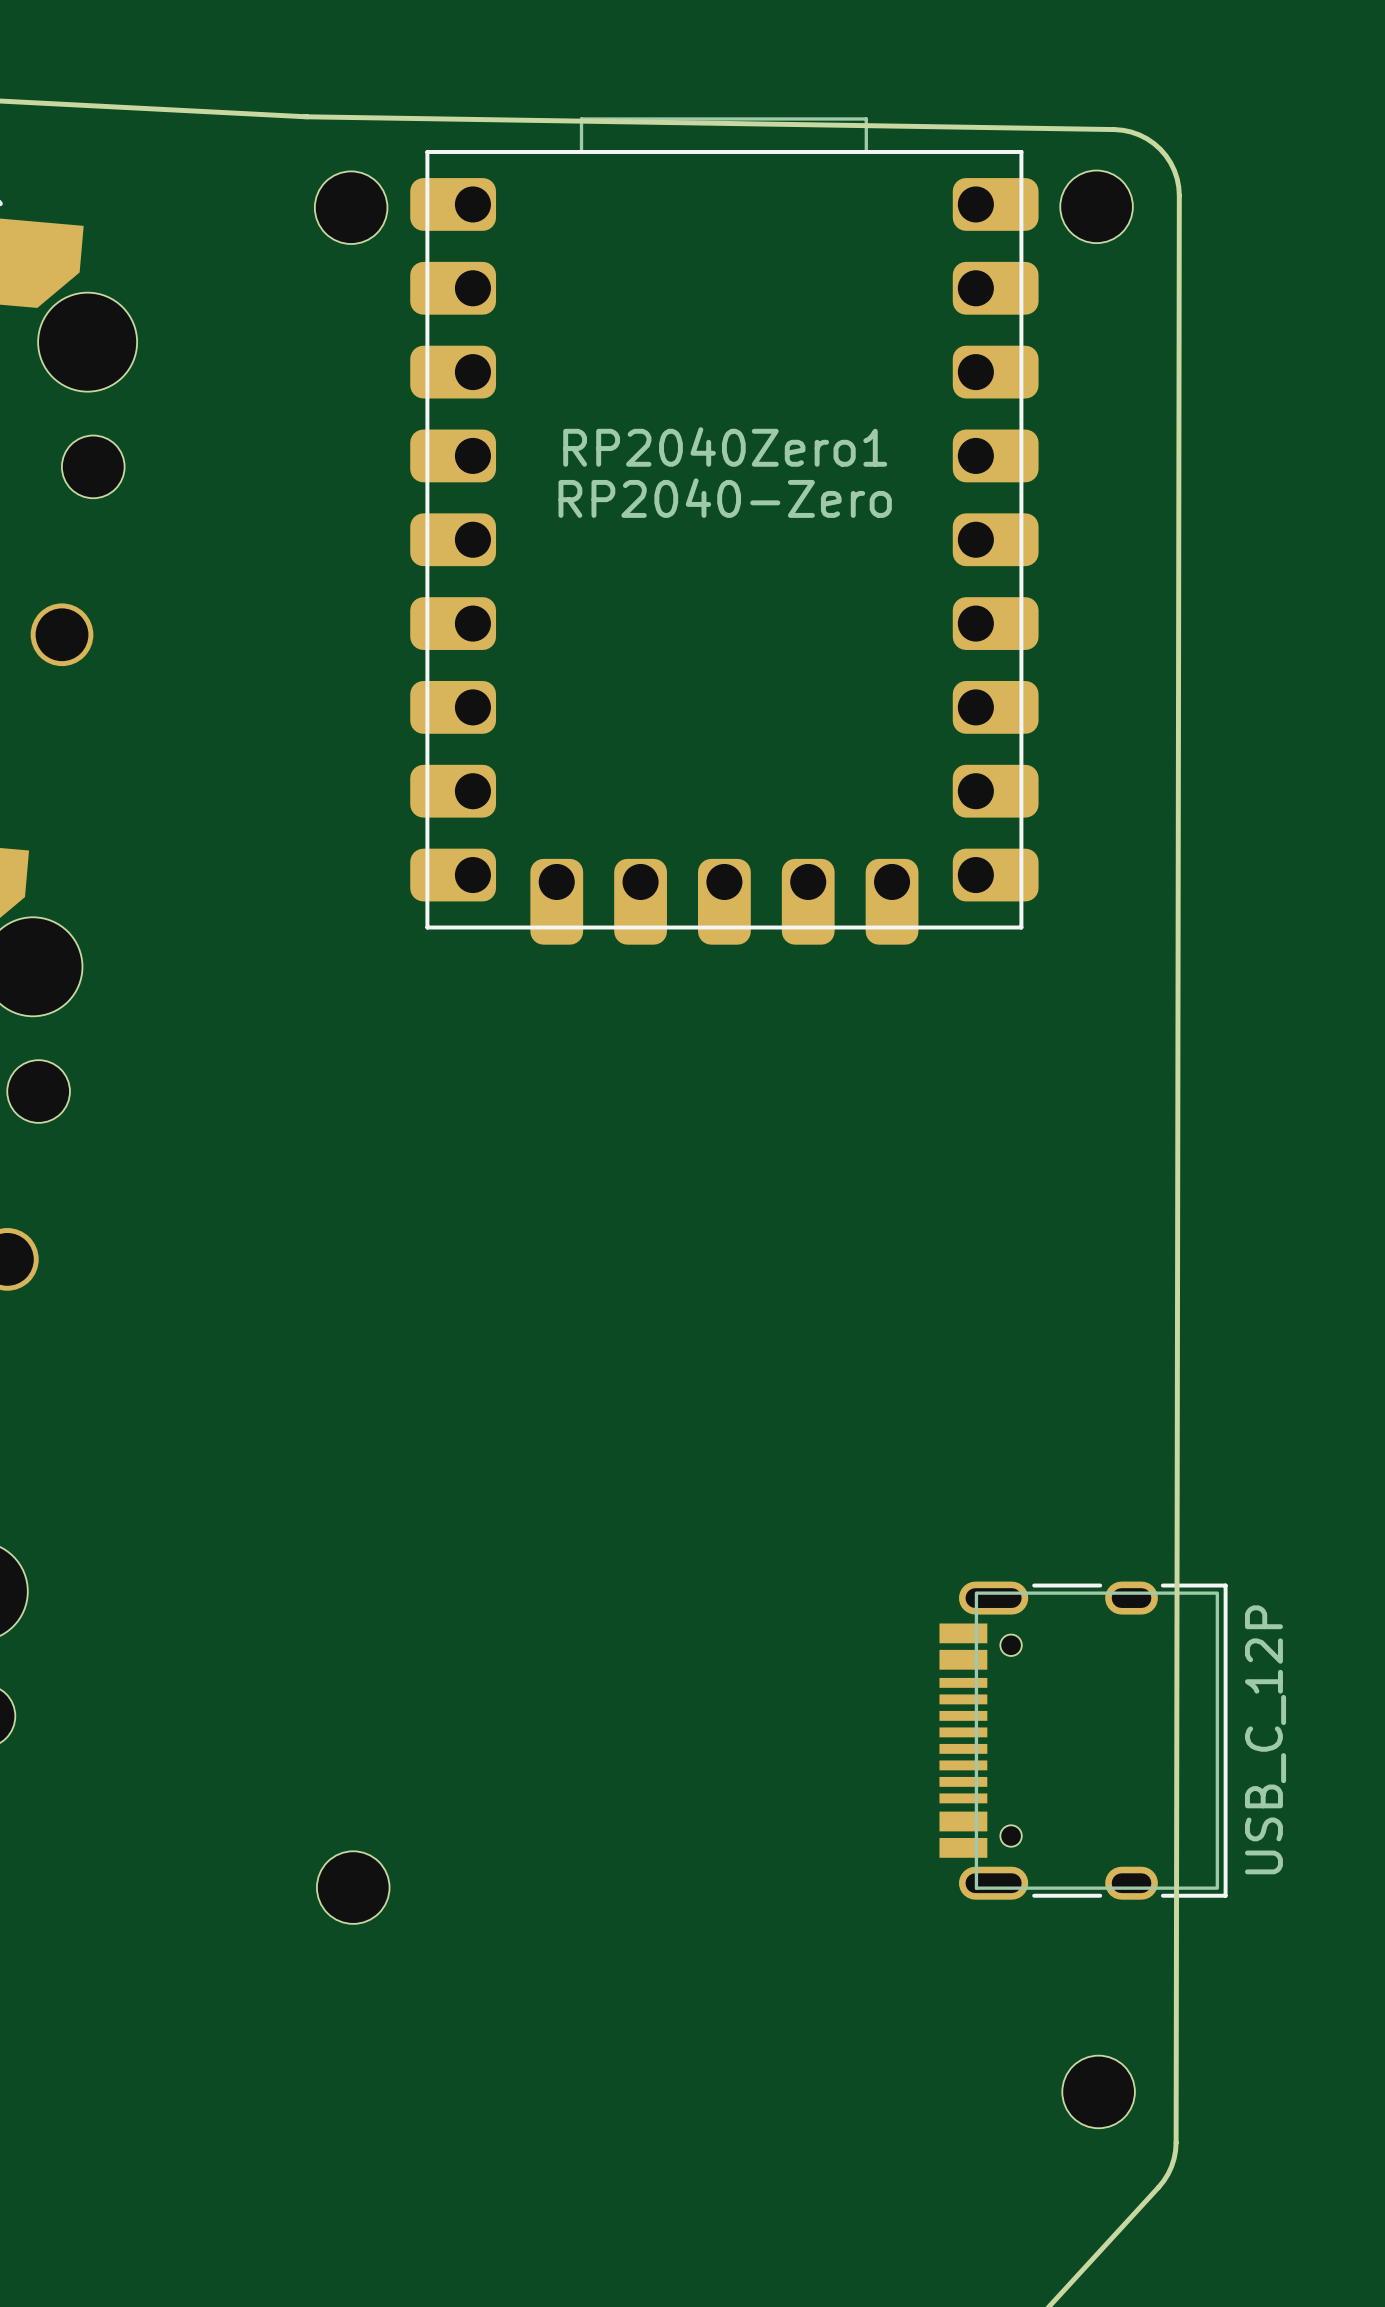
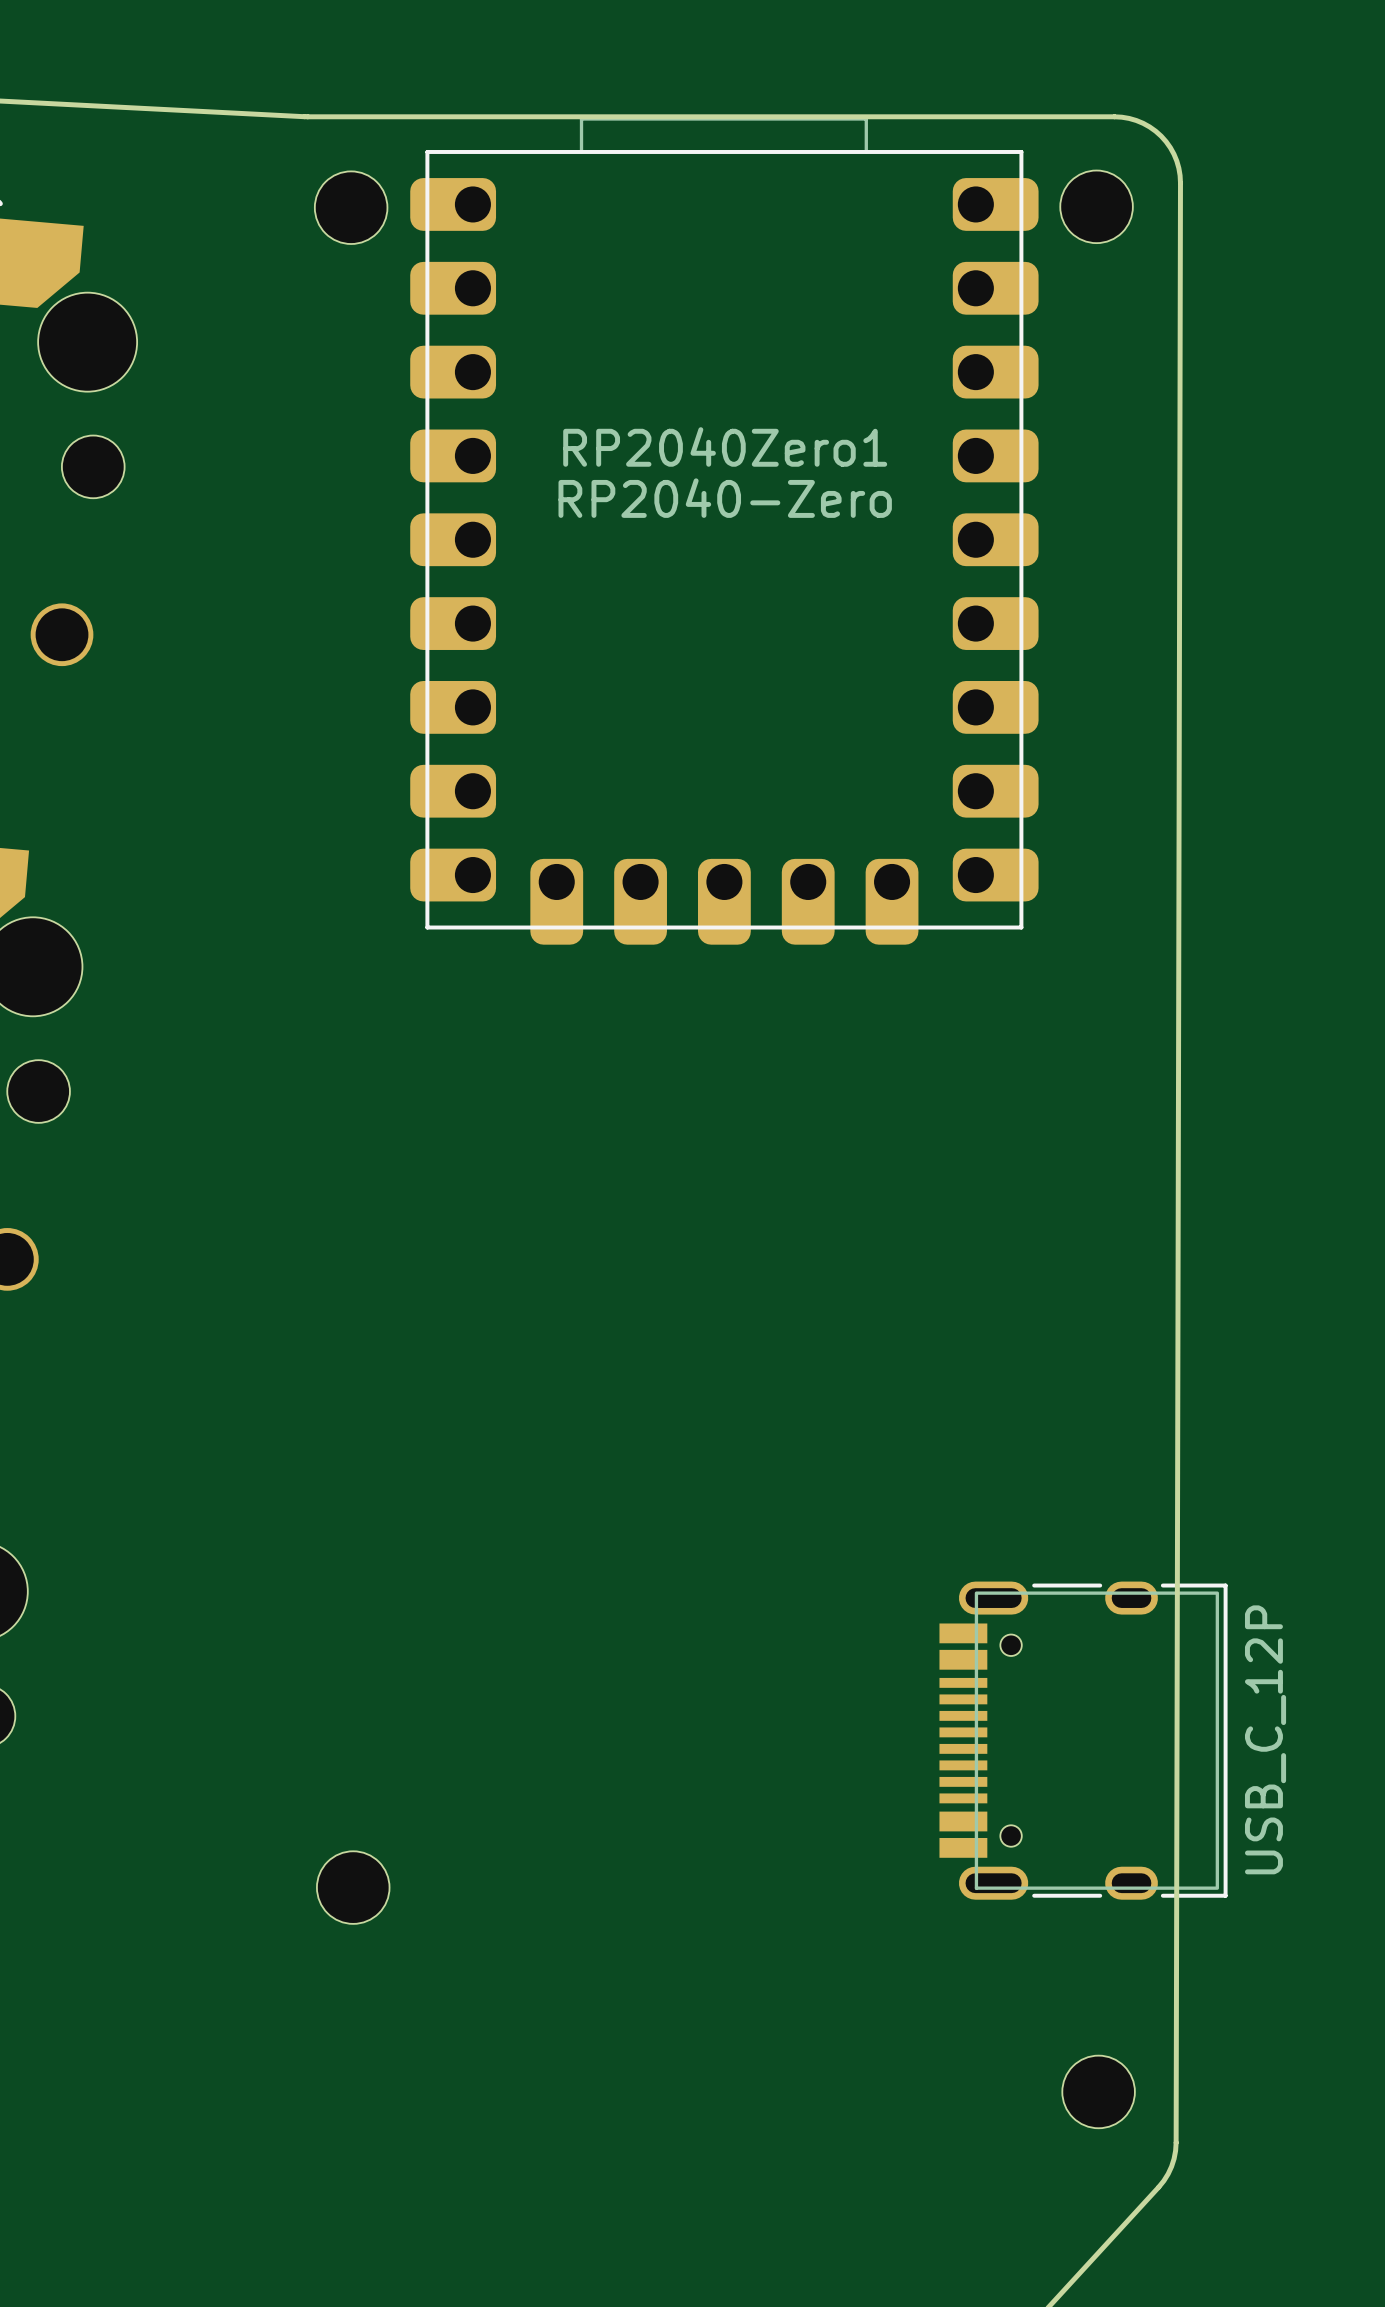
board edge: (304, 116) (1114, 129) (1131, 132) (1146, 138) (1165, 155) (1174, 170) (1179, 195) (1176, 2142) (1171, 2166) (1158, 2187) -> (304, 116) (1114, 116) (1136, 120) (1149, 126) (1166, 141) (1174, 154) (1178, 168) (1180, 182) (1176, 2142) (1171, 2166) (1158, 2187)

